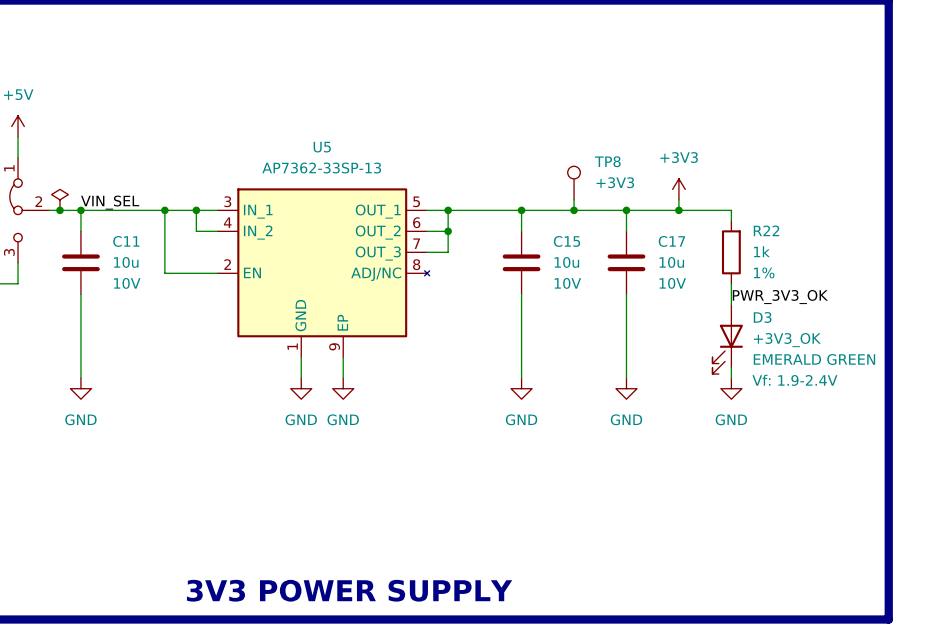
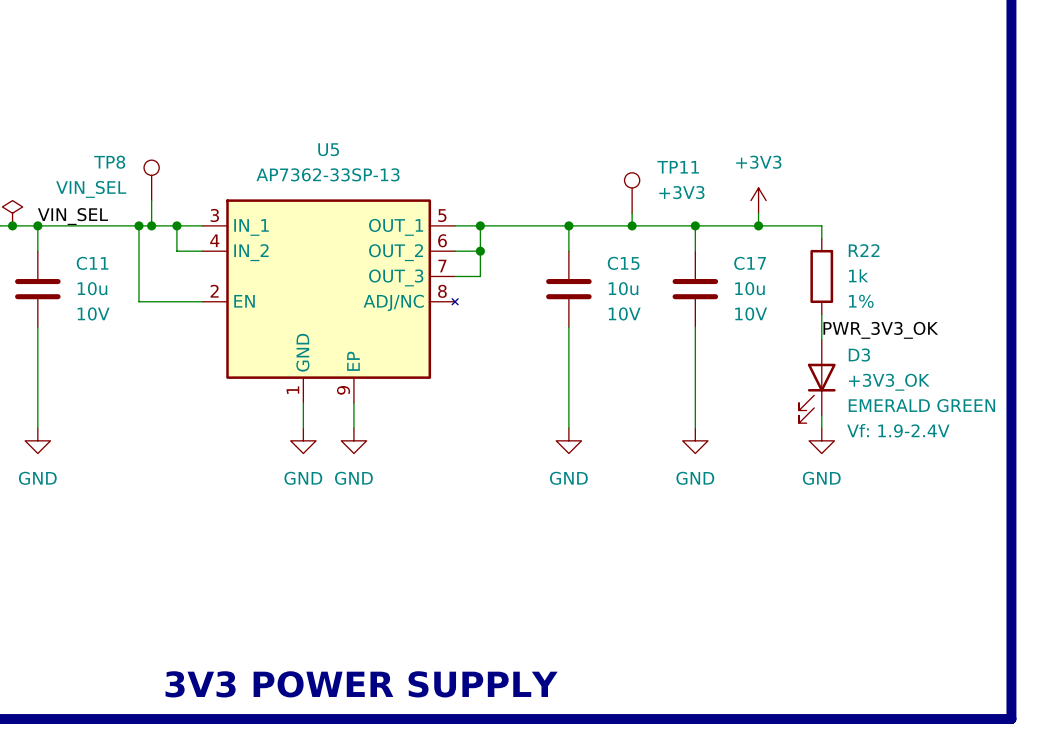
TP8 name: TP8 (607, 161) -> TP11 (678, 167)
TP8: none -> VIN_SEL (151, 180)
wire: none -> (151, 200) (151, 225)
junction: none -> (151, 225)

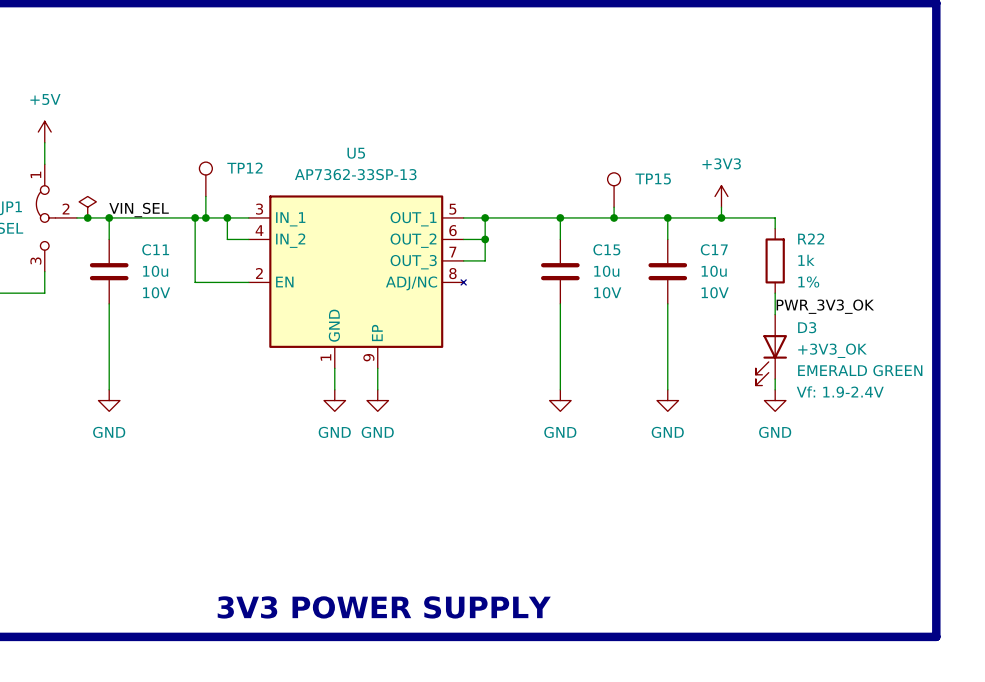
TP8 name: TP8 (109, 162) -> TP12 (244, 168)
TP11 name: TP11 (678, 167) -> TP15 (653, 179)
TP8 value: VIN_SEL (91, 189) -> none
TP11 value: +3V3 (681, 192) -> none

